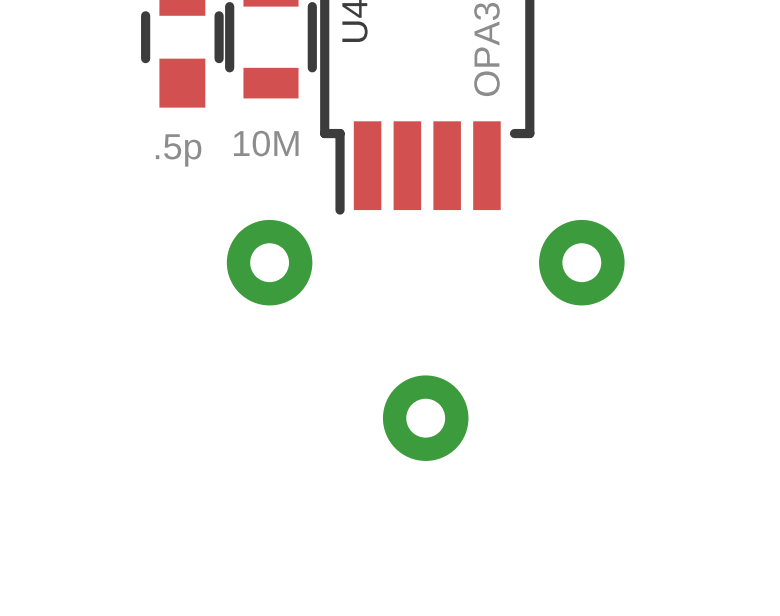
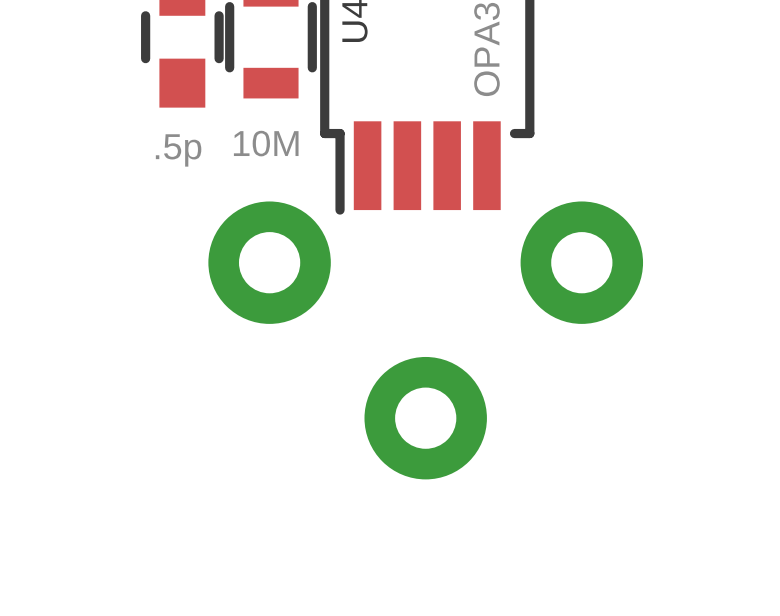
part footprint: [226, 219, 625, 461] -> [208, 201, 644, 480]

